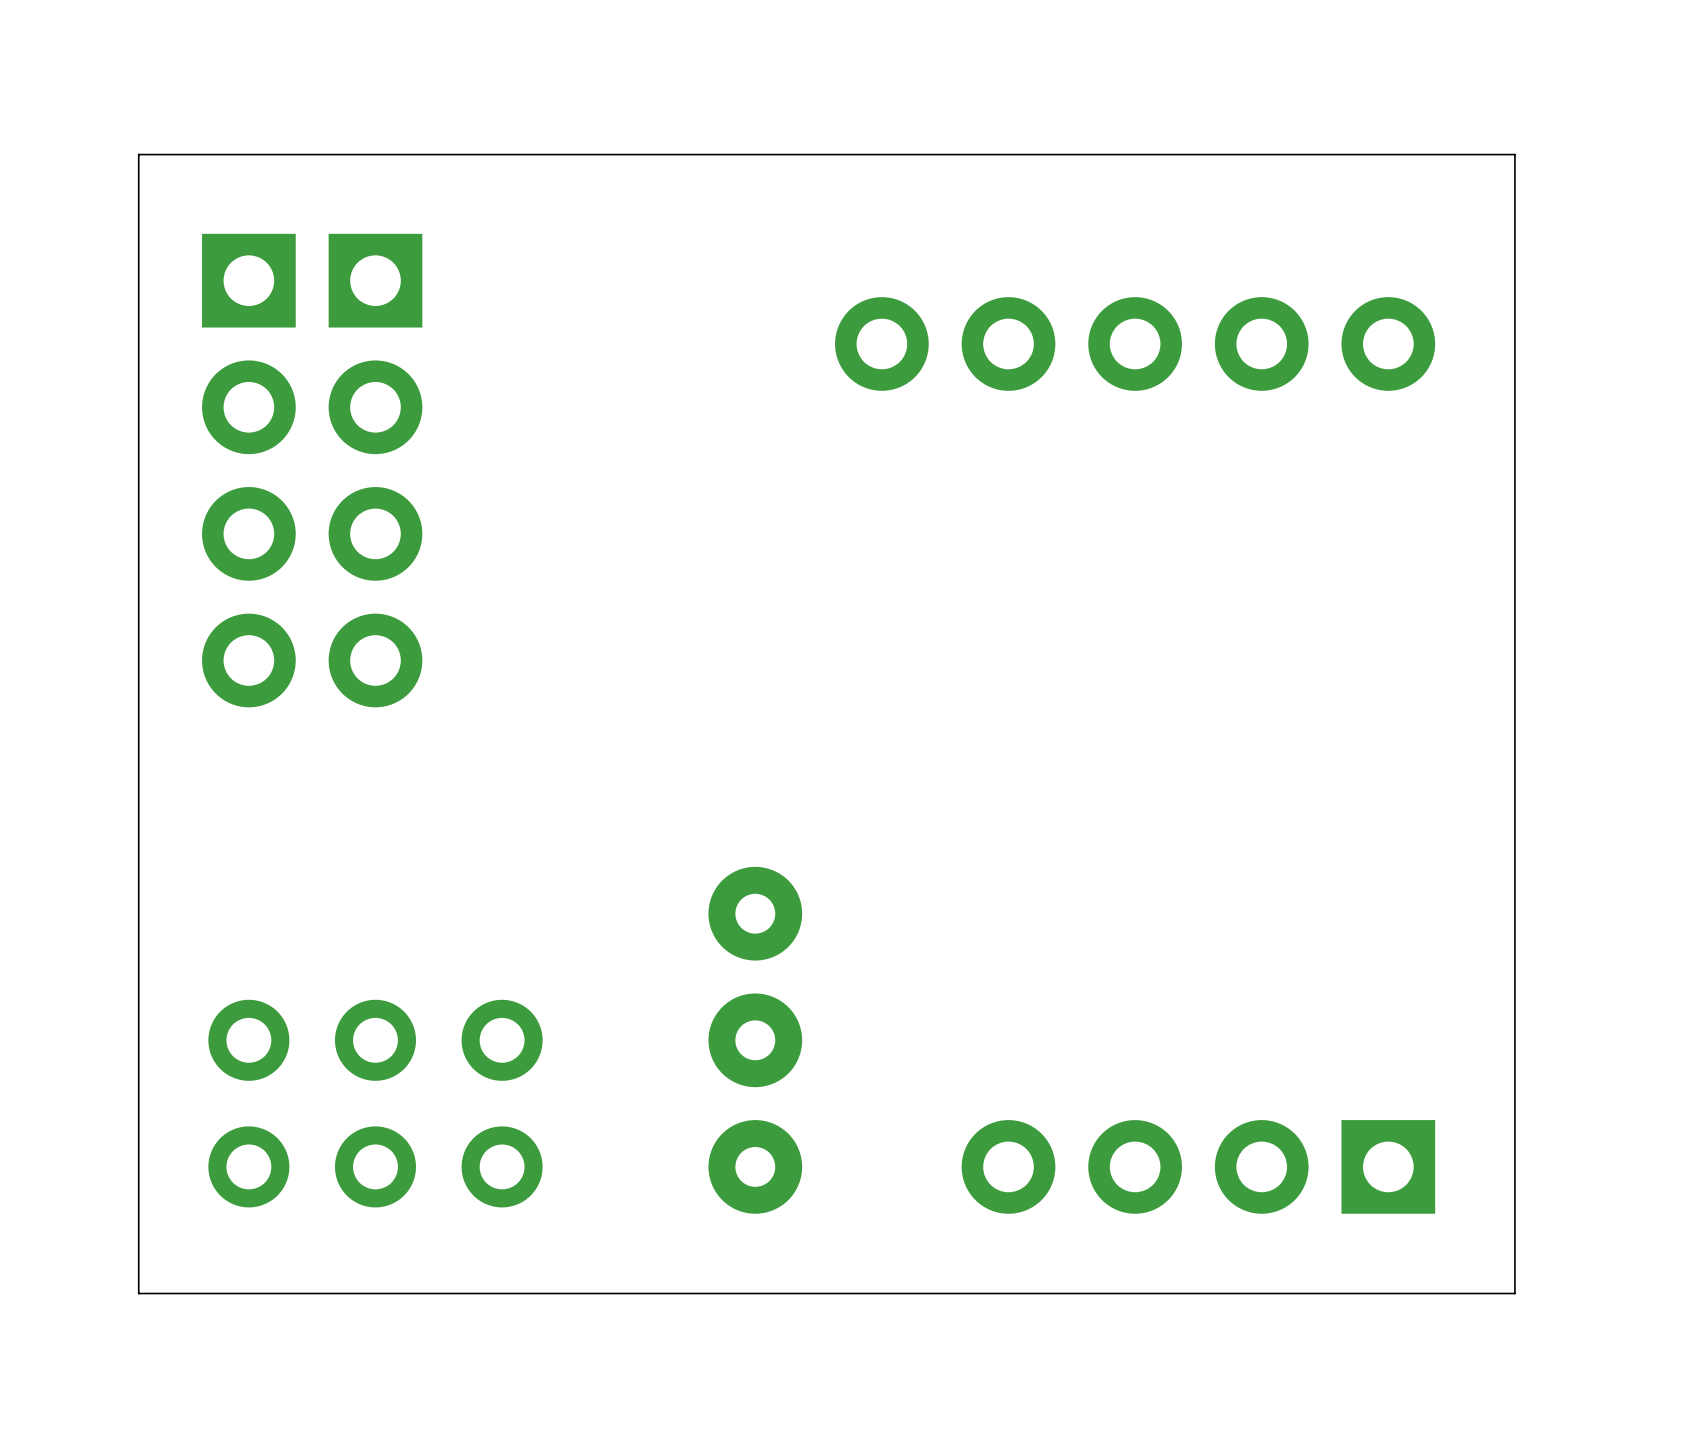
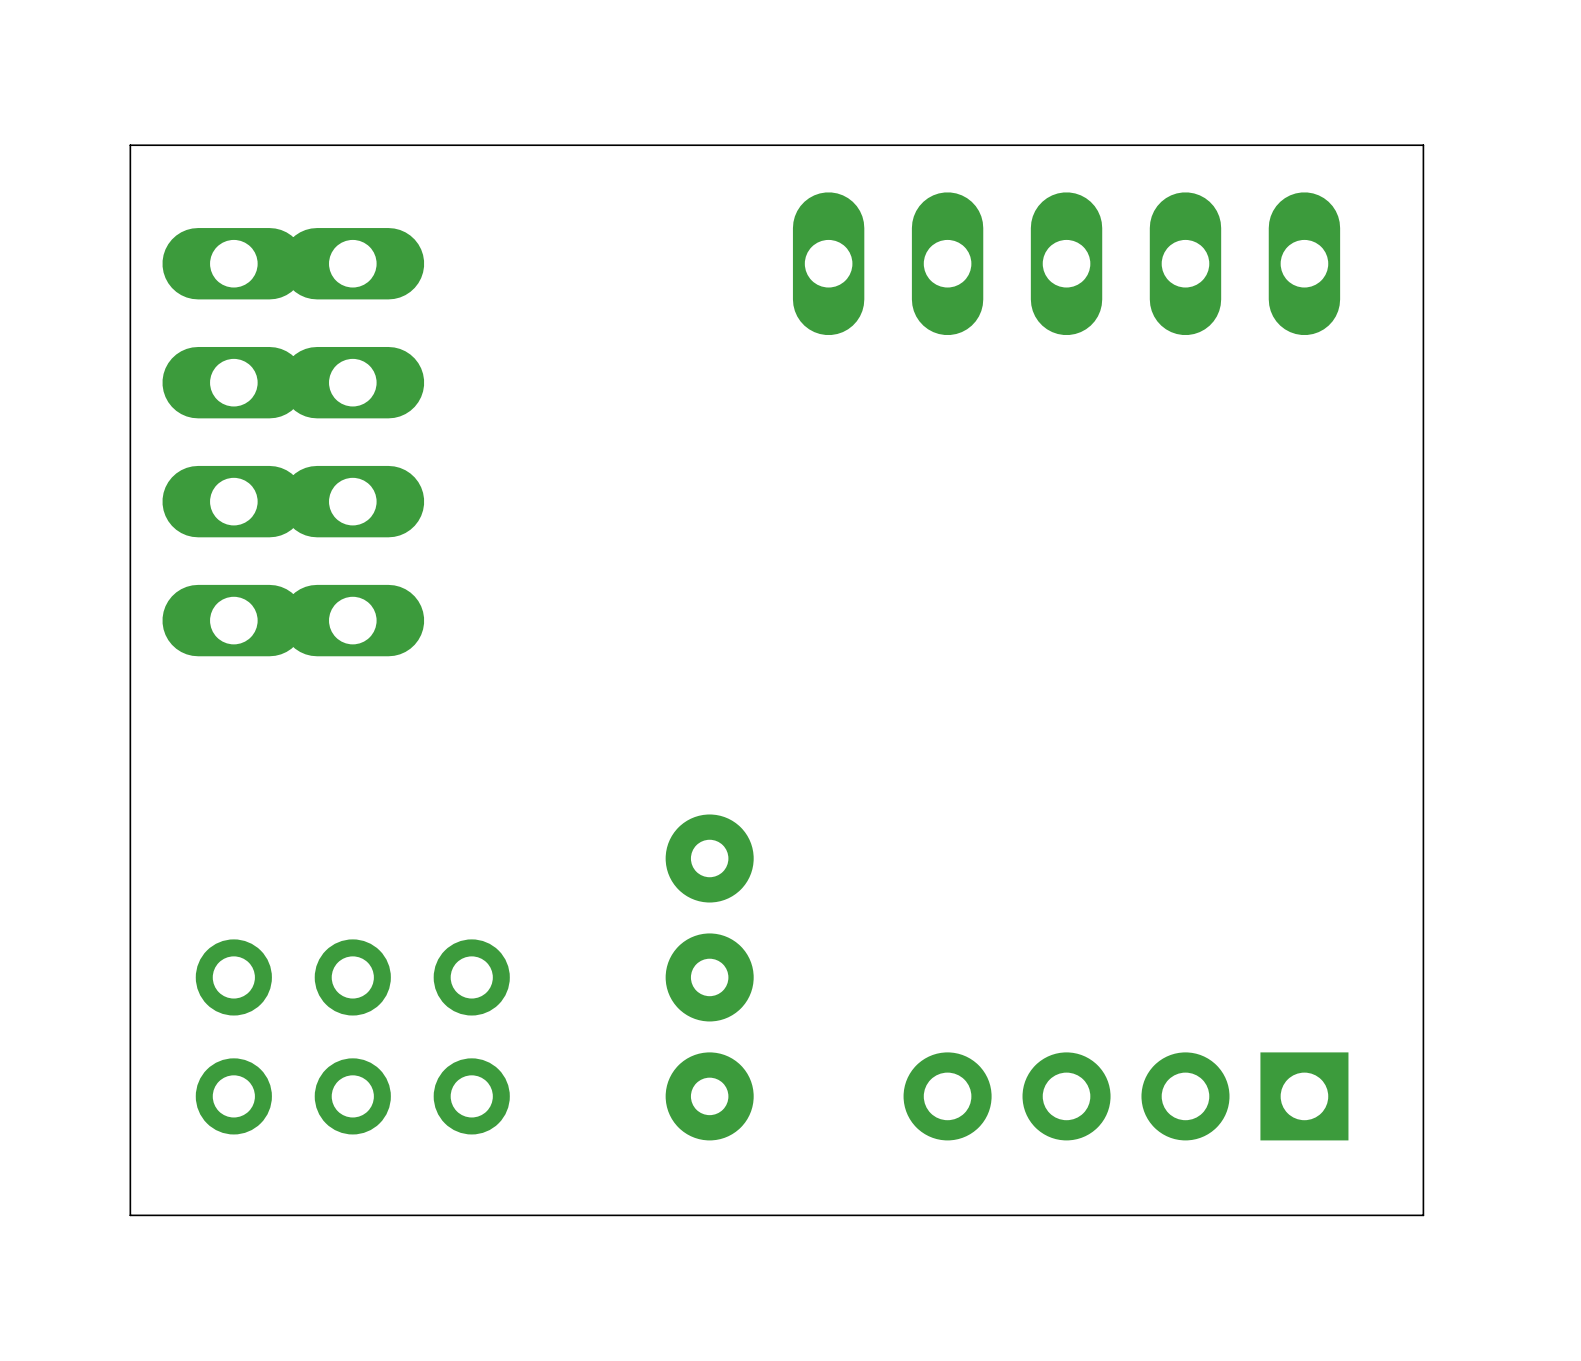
part footprint: [202, 233, 296, 708] -> [162, 228, 306, 657]
part footprint: [328, 233, 423, 708] -> [281, 228, 425, 657]
part: none -> (1066, 263)
part: (1135, 343) -> none

